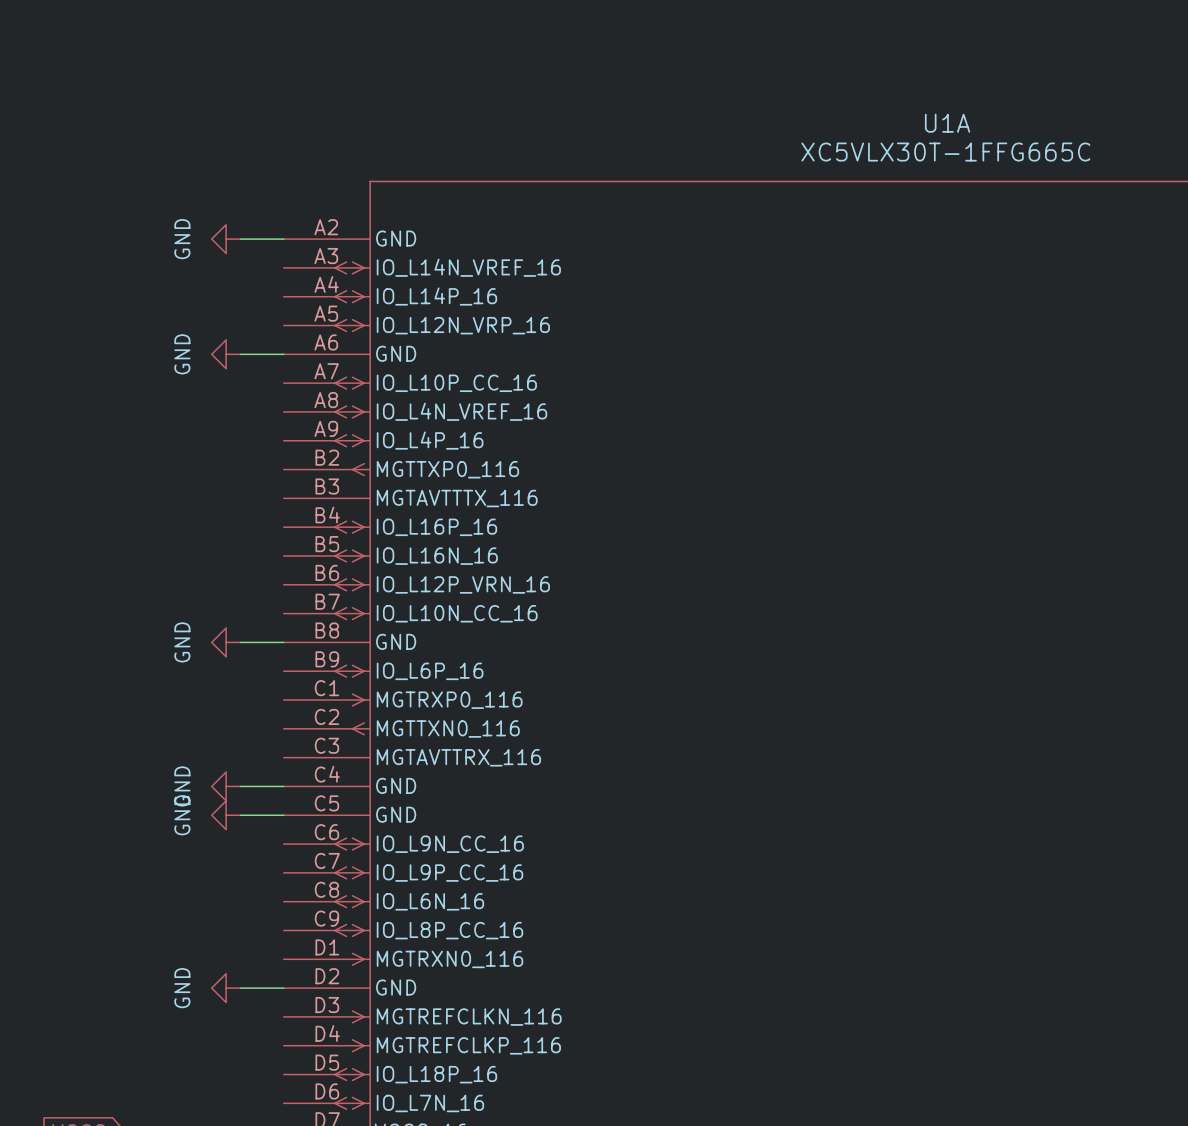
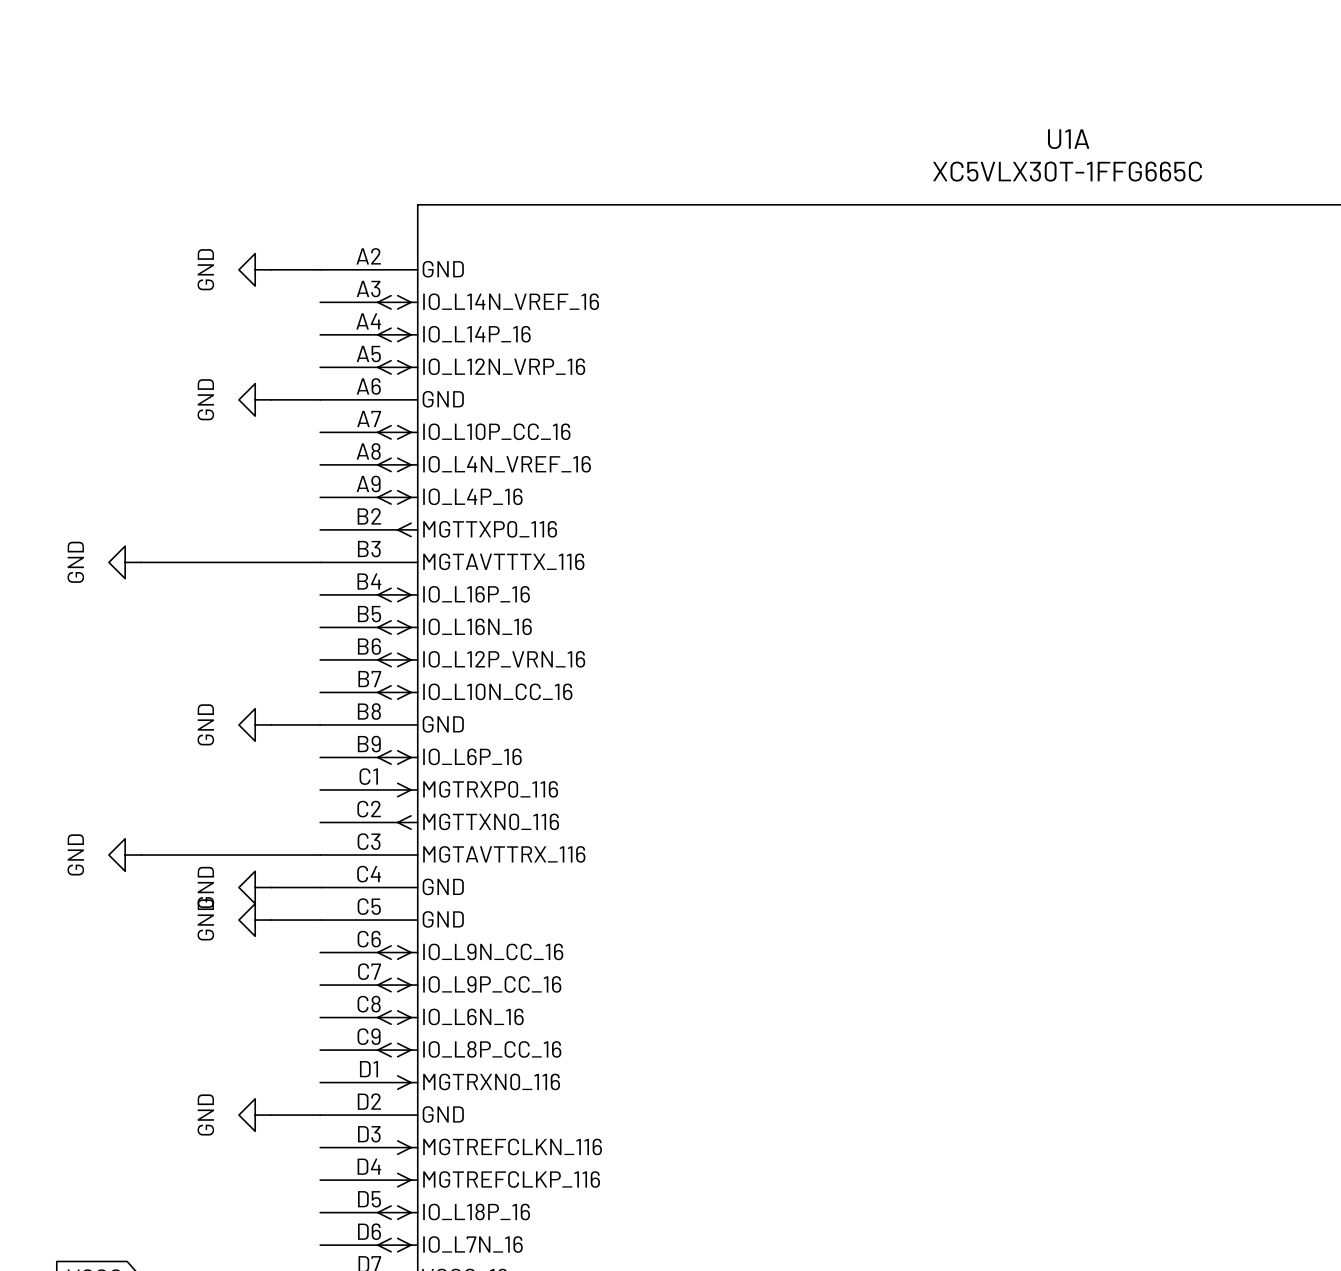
power symbol: none -> GND (125, 562)
wire: none -> (141, 562) (320, 562)
power symbol: none -> GND (125, 855)
wire: none -> (141, 855) (320, 855)

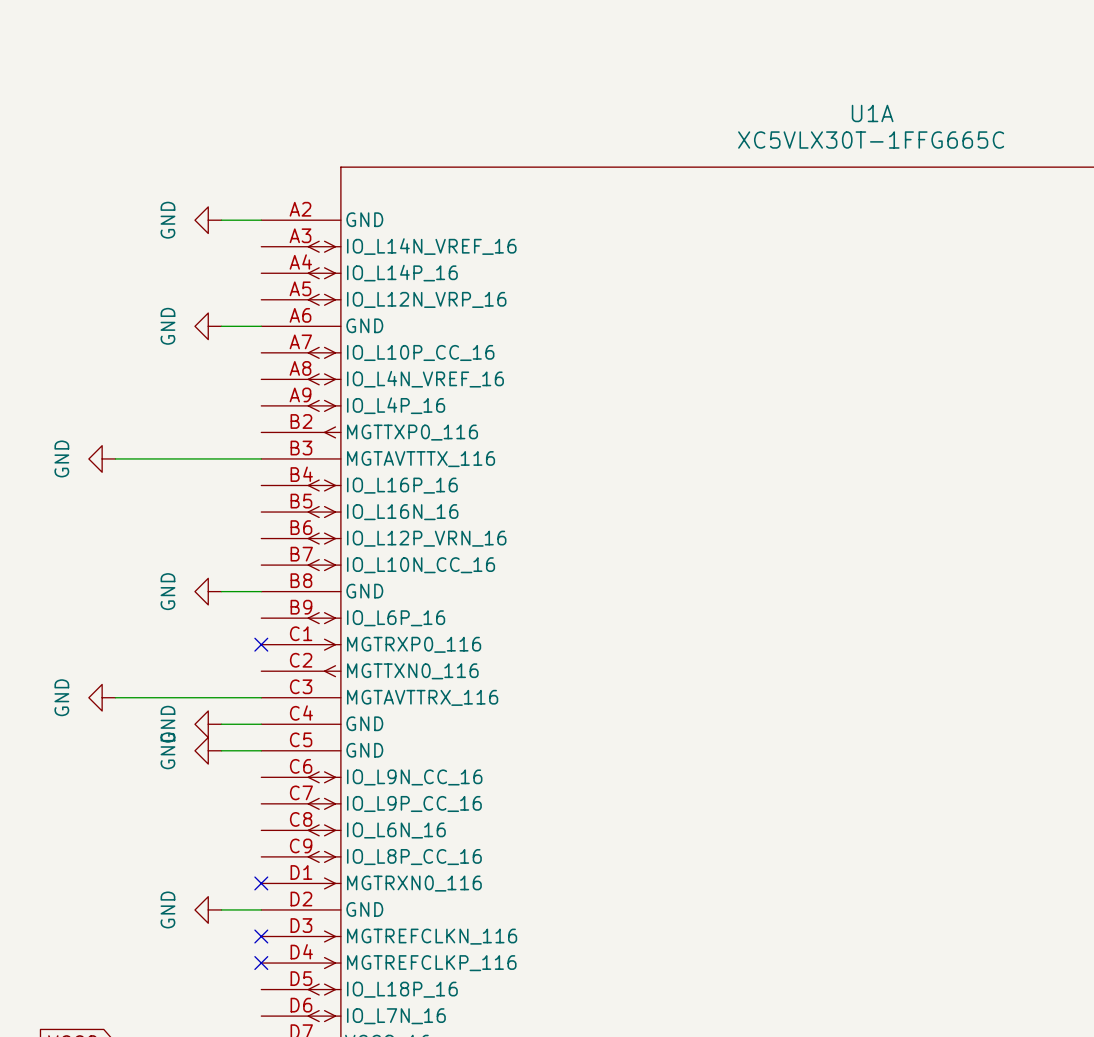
no-connect mark: none -> (261, 644)
no-connect mark: none -> (261, 883)
no-connect mark: none -> (261, 936)
no-connect mark: none -> (261, 963)

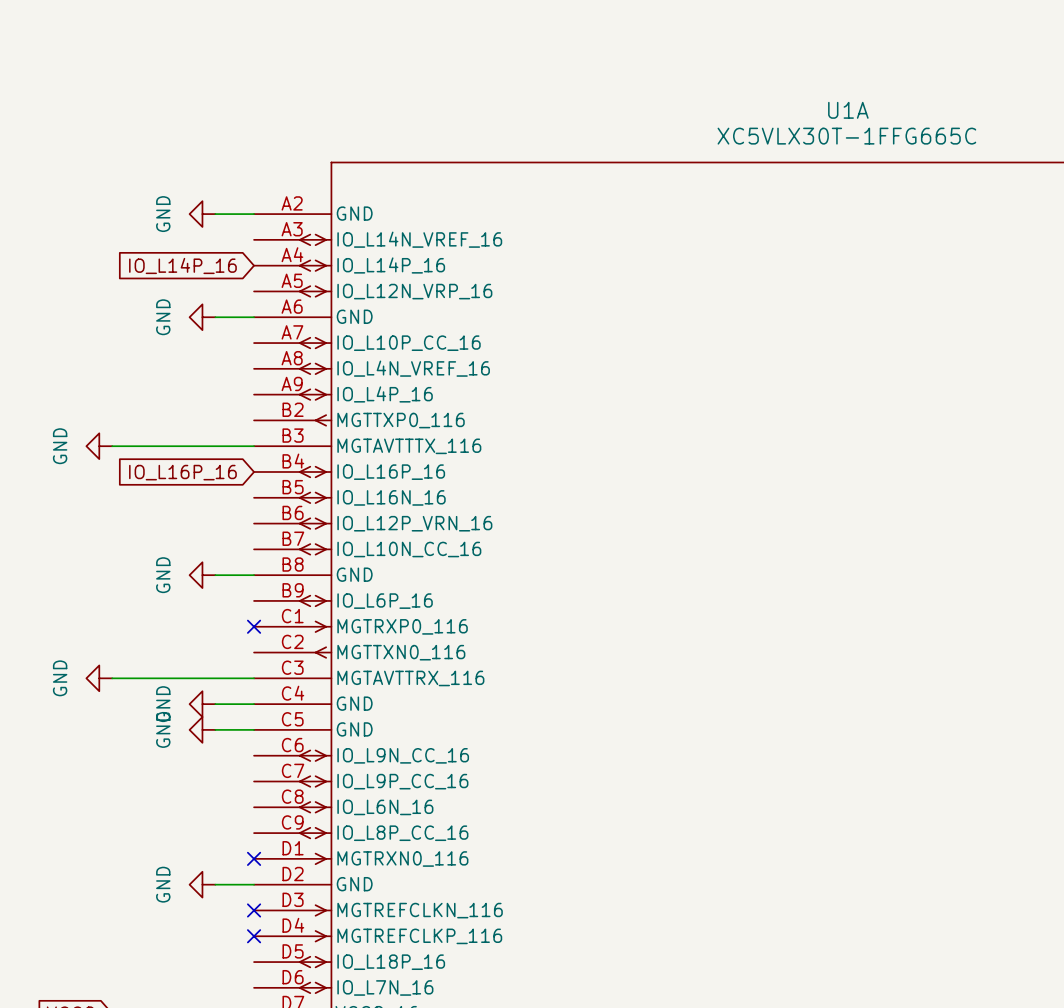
global label: none -> IO_L14P_16 (182, 265)
global label: none -> IO_L16P_16 (182, 472)

